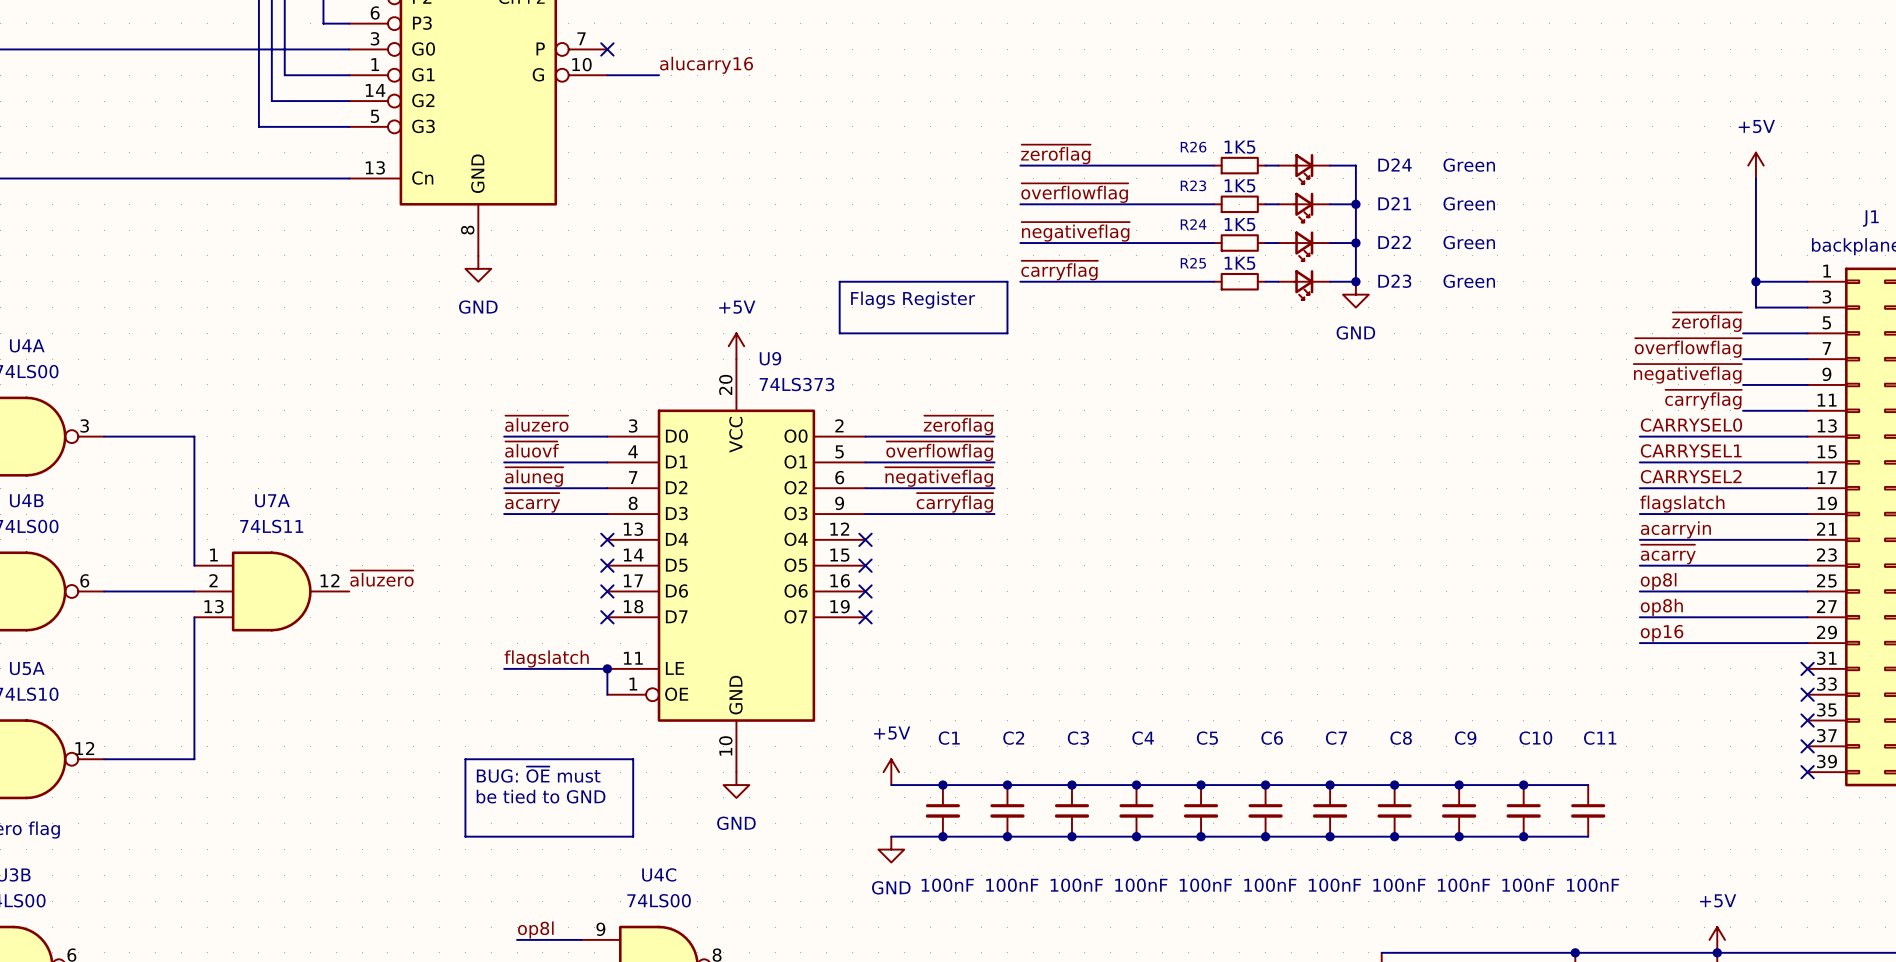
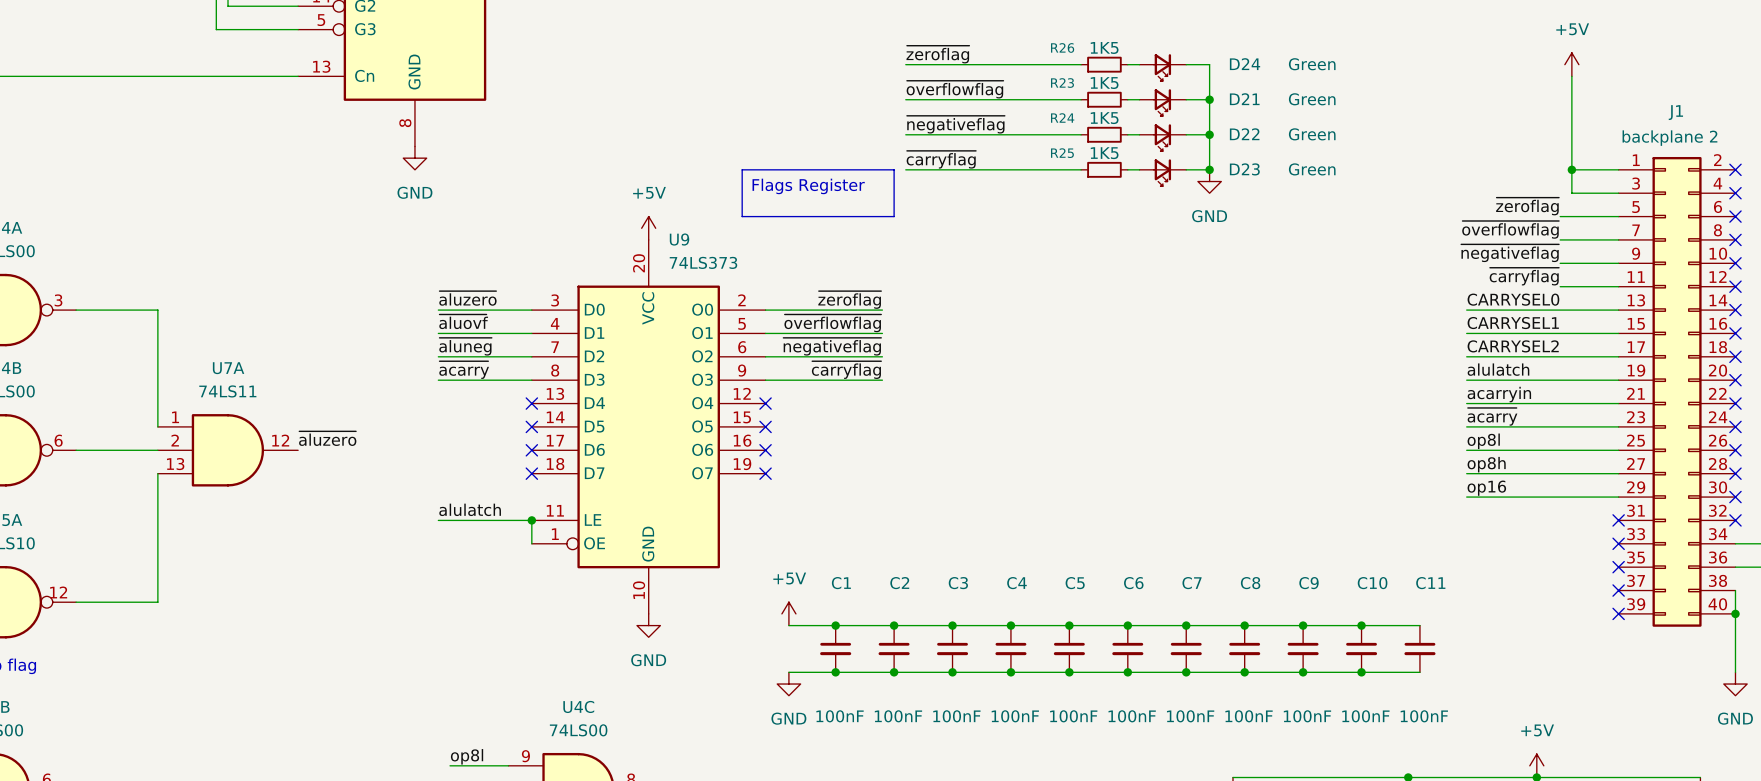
label: flagslatch (1682, 504) -> alulatch (1498, 369)
label: flagslatch (546, 658) -> alulatch (470, 509)
line: (465, 759) (633, 759) (633, 836) (465, 836) (465, 759) -> none
text: BUG: ~{OE} must (538, 774) -> none
text: be tied to GND (541, 796) -> none

